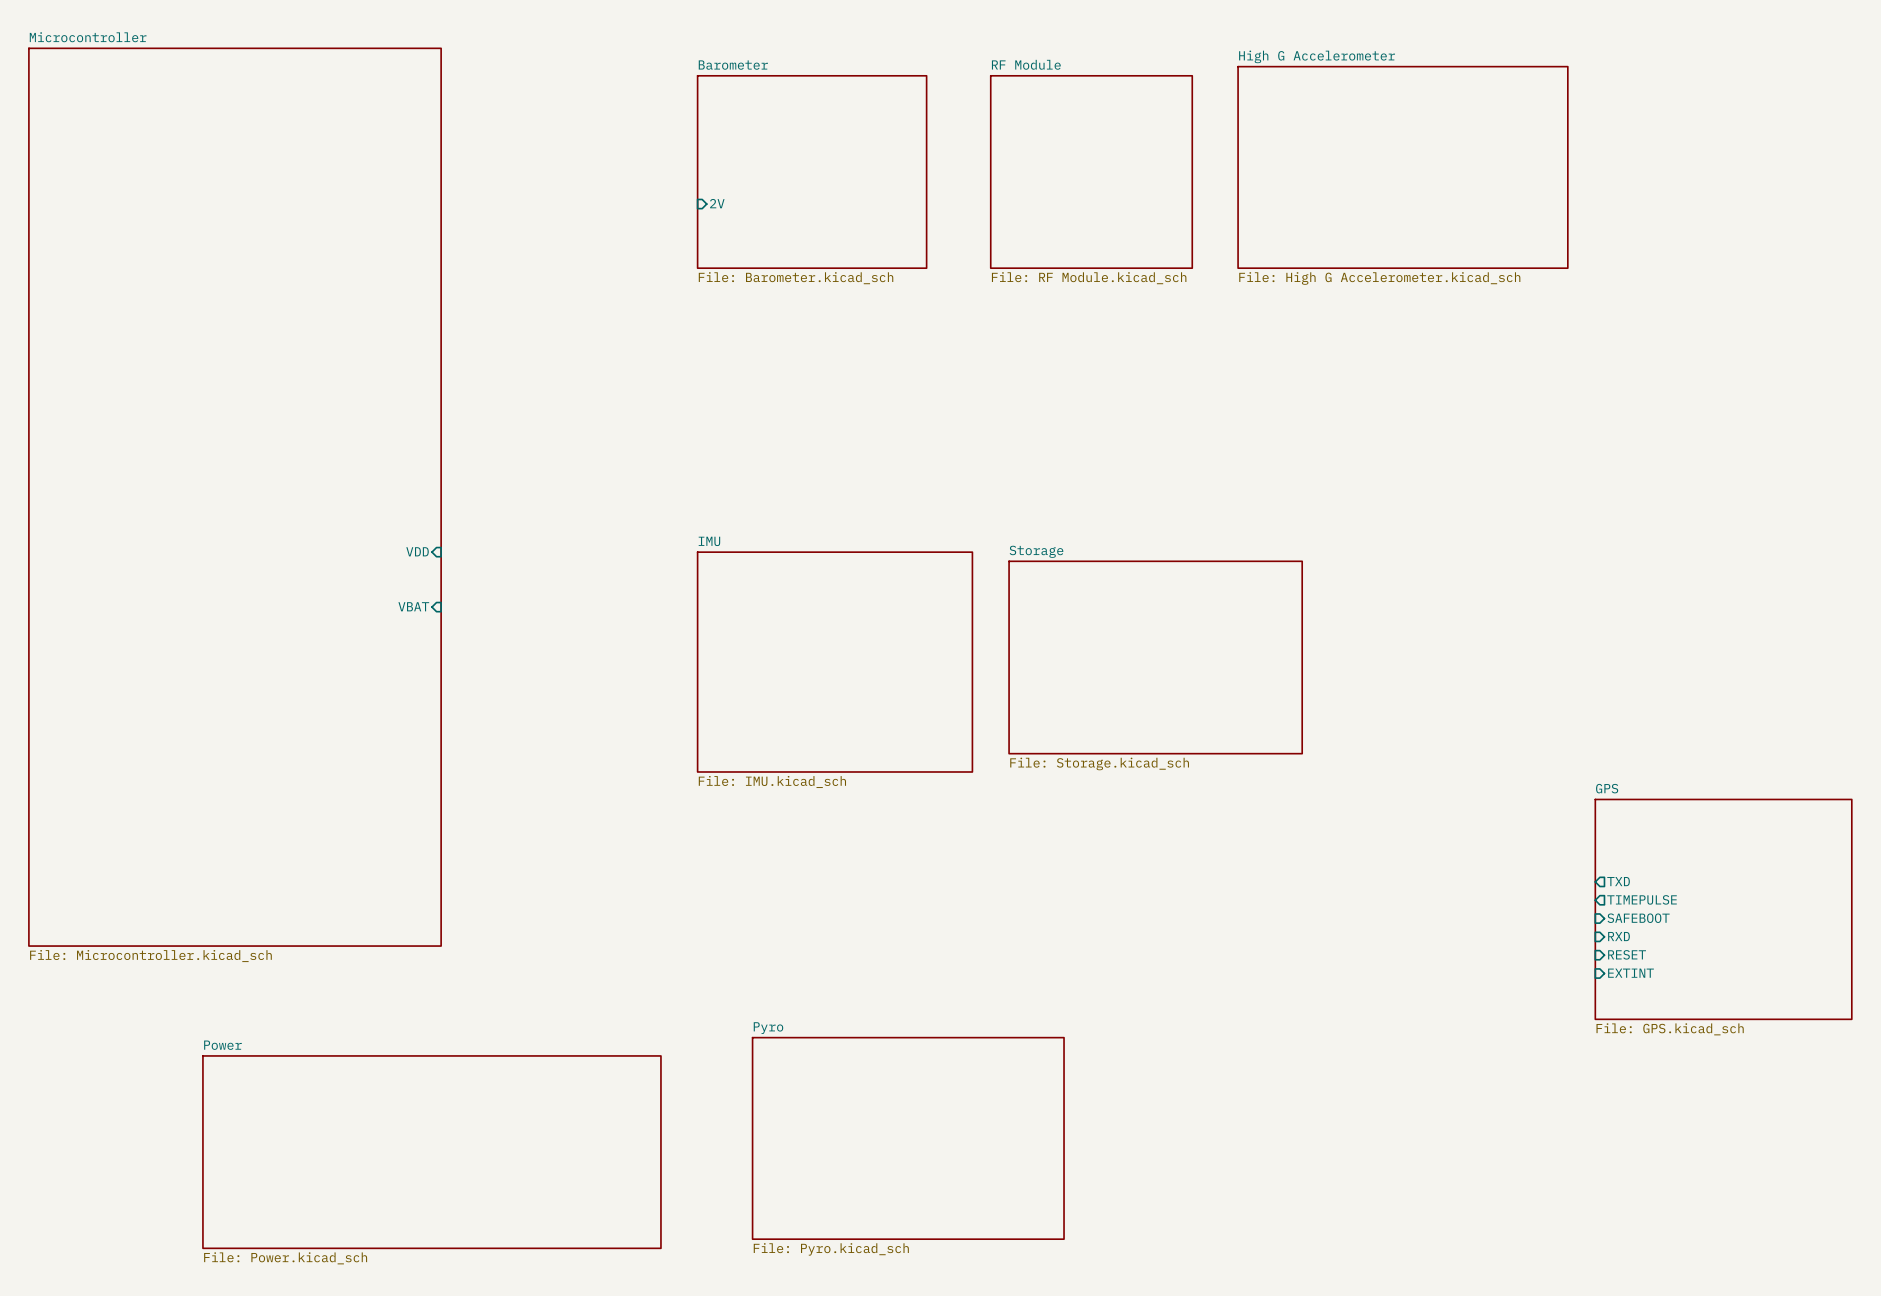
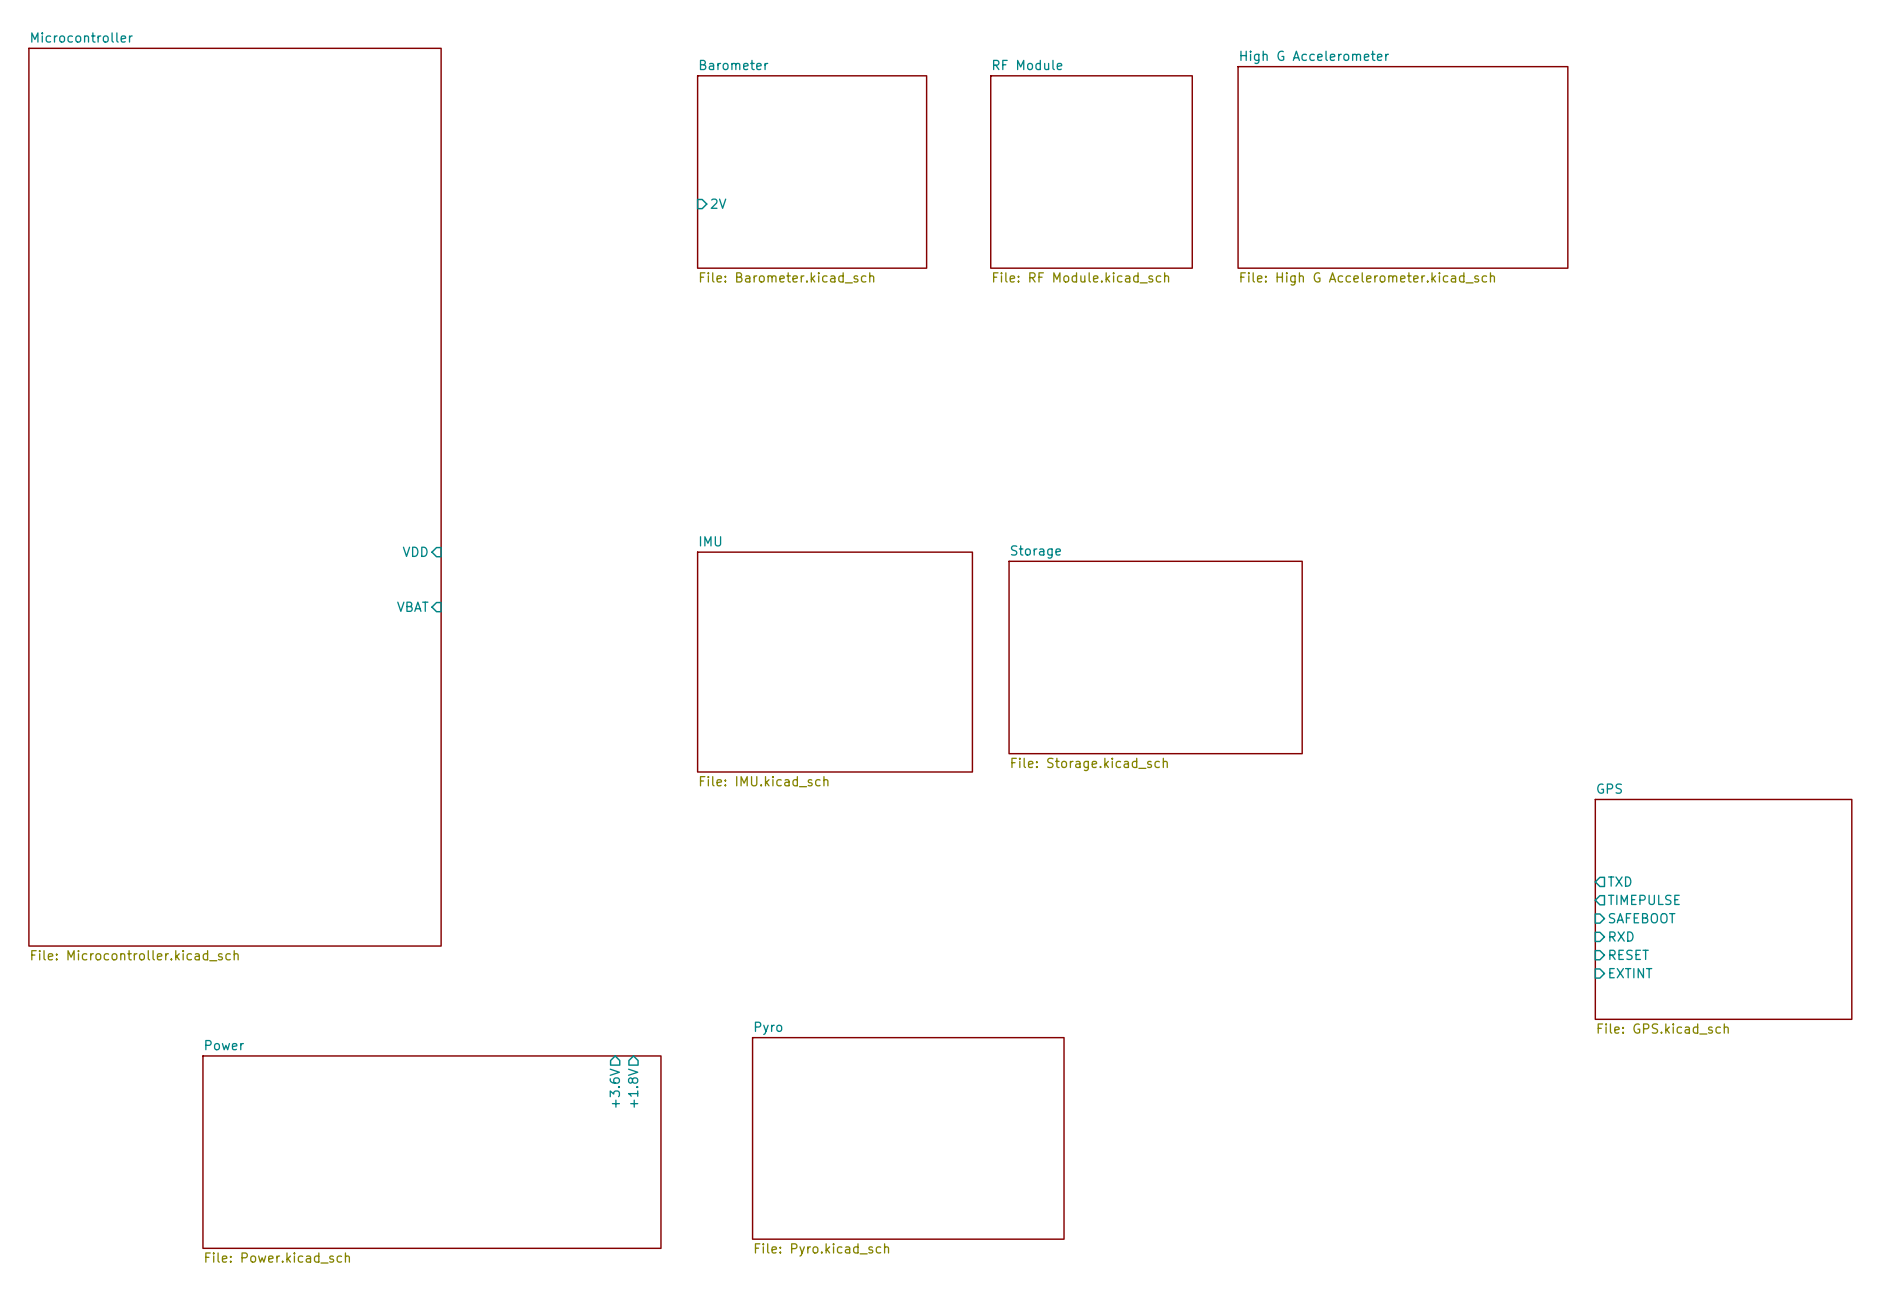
sheet pin: none -> +3.6V (614, 1088)
sheet pin: none -> +1.8V (633, 1088)

